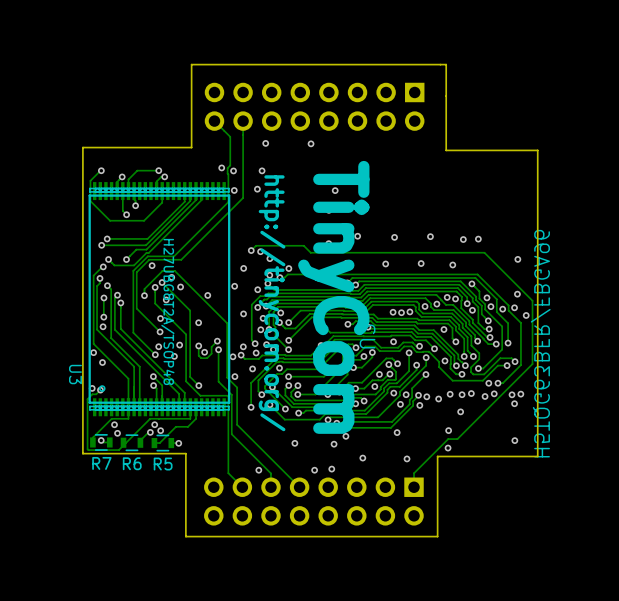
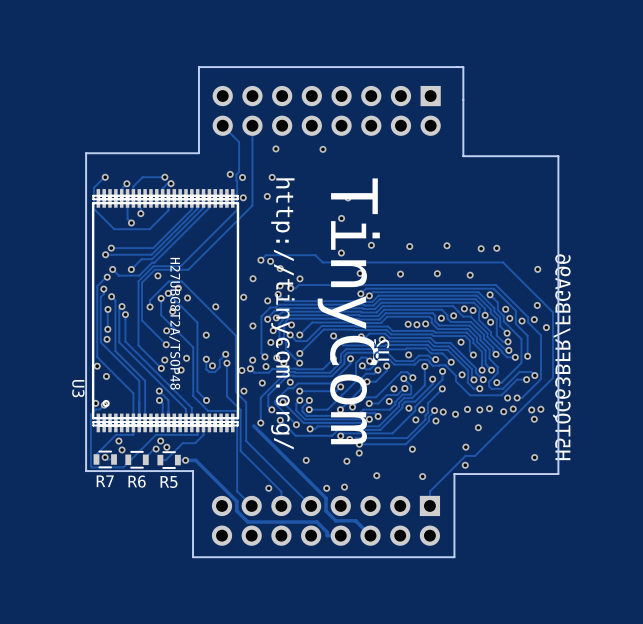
track: none -> (253, 425) (326, 498) (326, 511) (335, 520) (355, 520) (370, 535)
track: none -> (185, 460) (195, 460) (236, 501) (236, 510) (247, 522) (316, 522) (327, 532) (327, 535) (340, 535)

